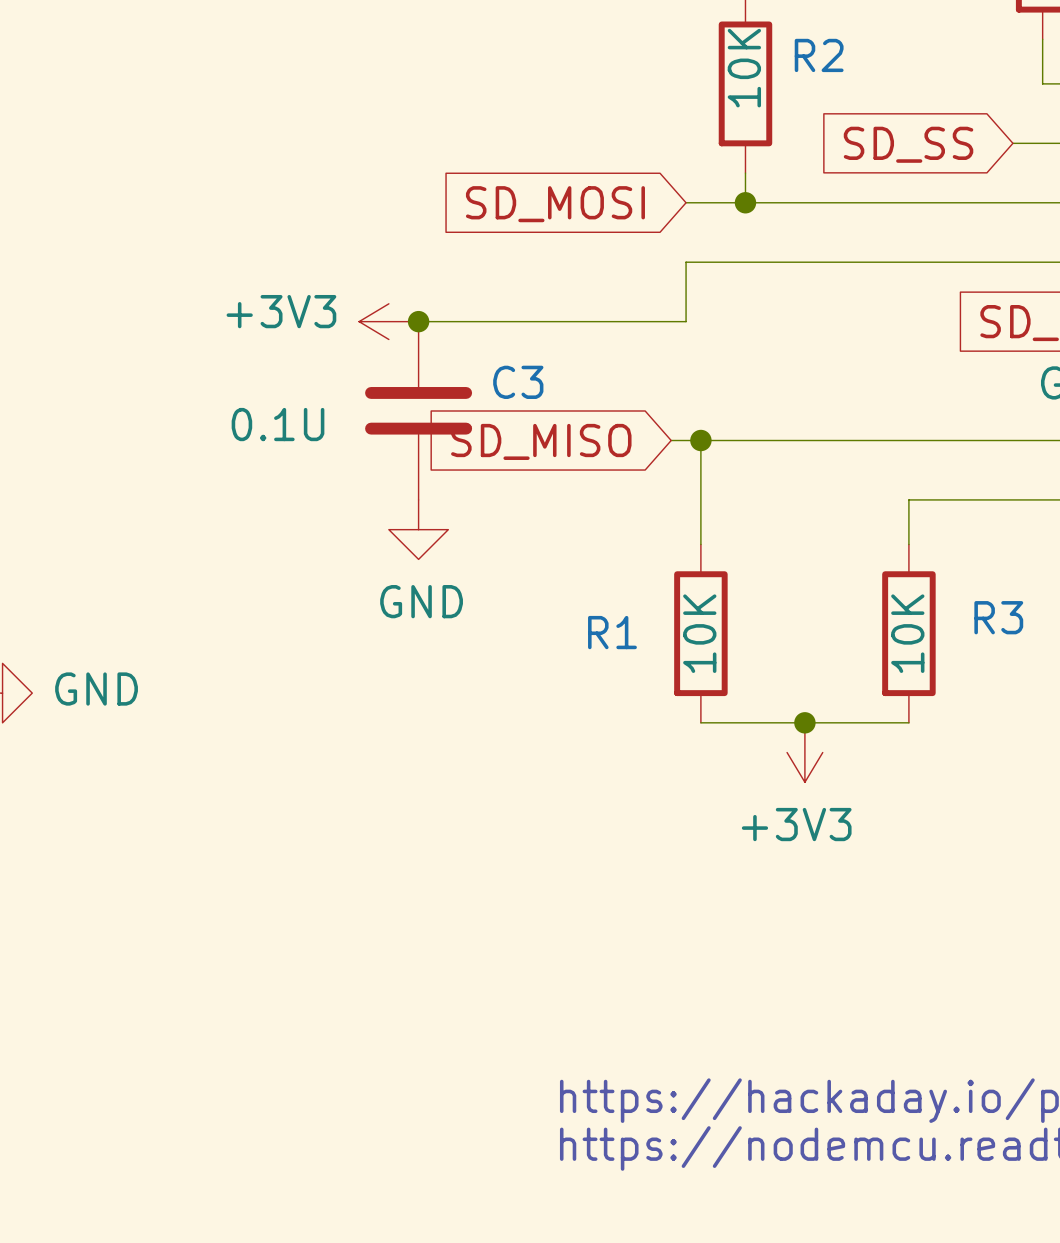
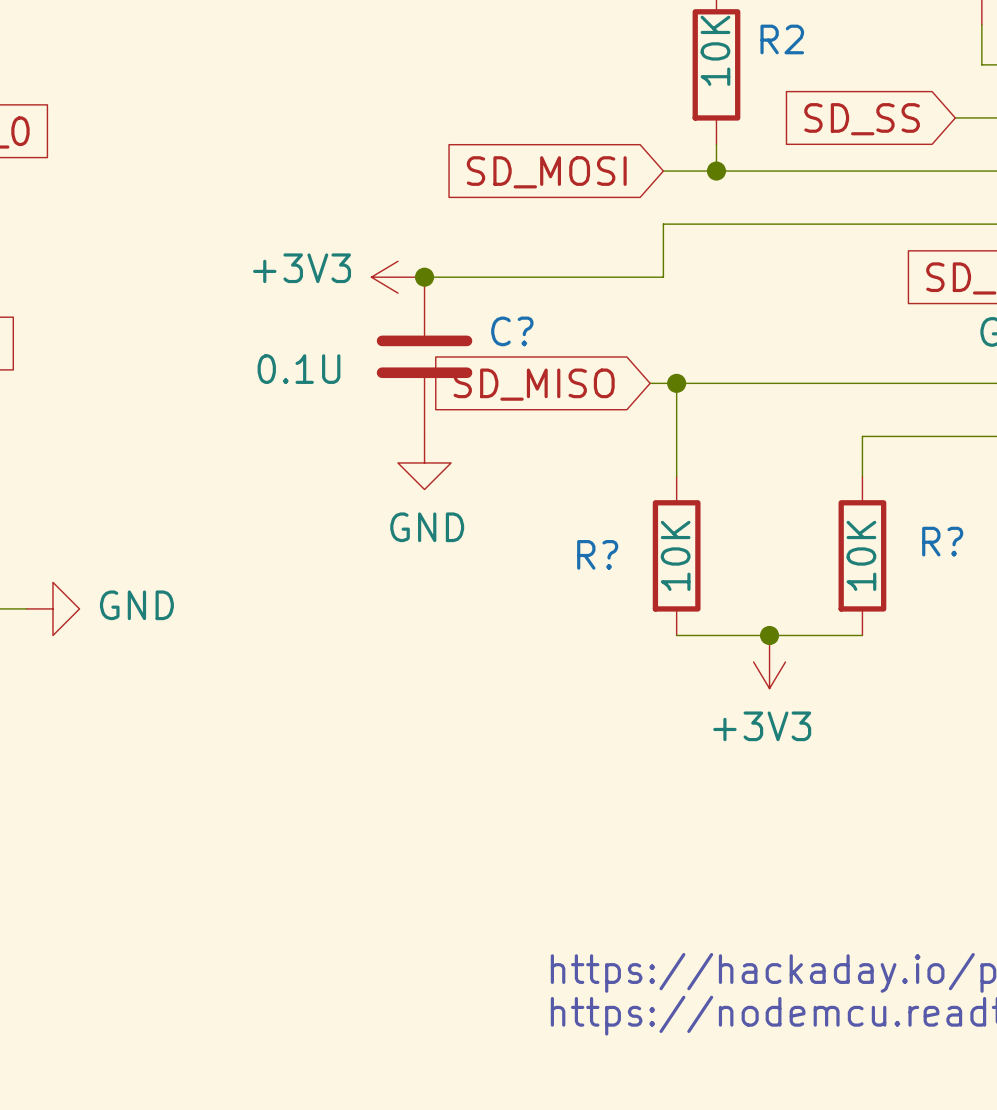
C3 name: C3 (518, 382) -> C? (512, 331)
R3 name: R3 (998, 617) -> R? (942, 541)
R1 name: R1 (612, 632) -> R? (597, 554)

